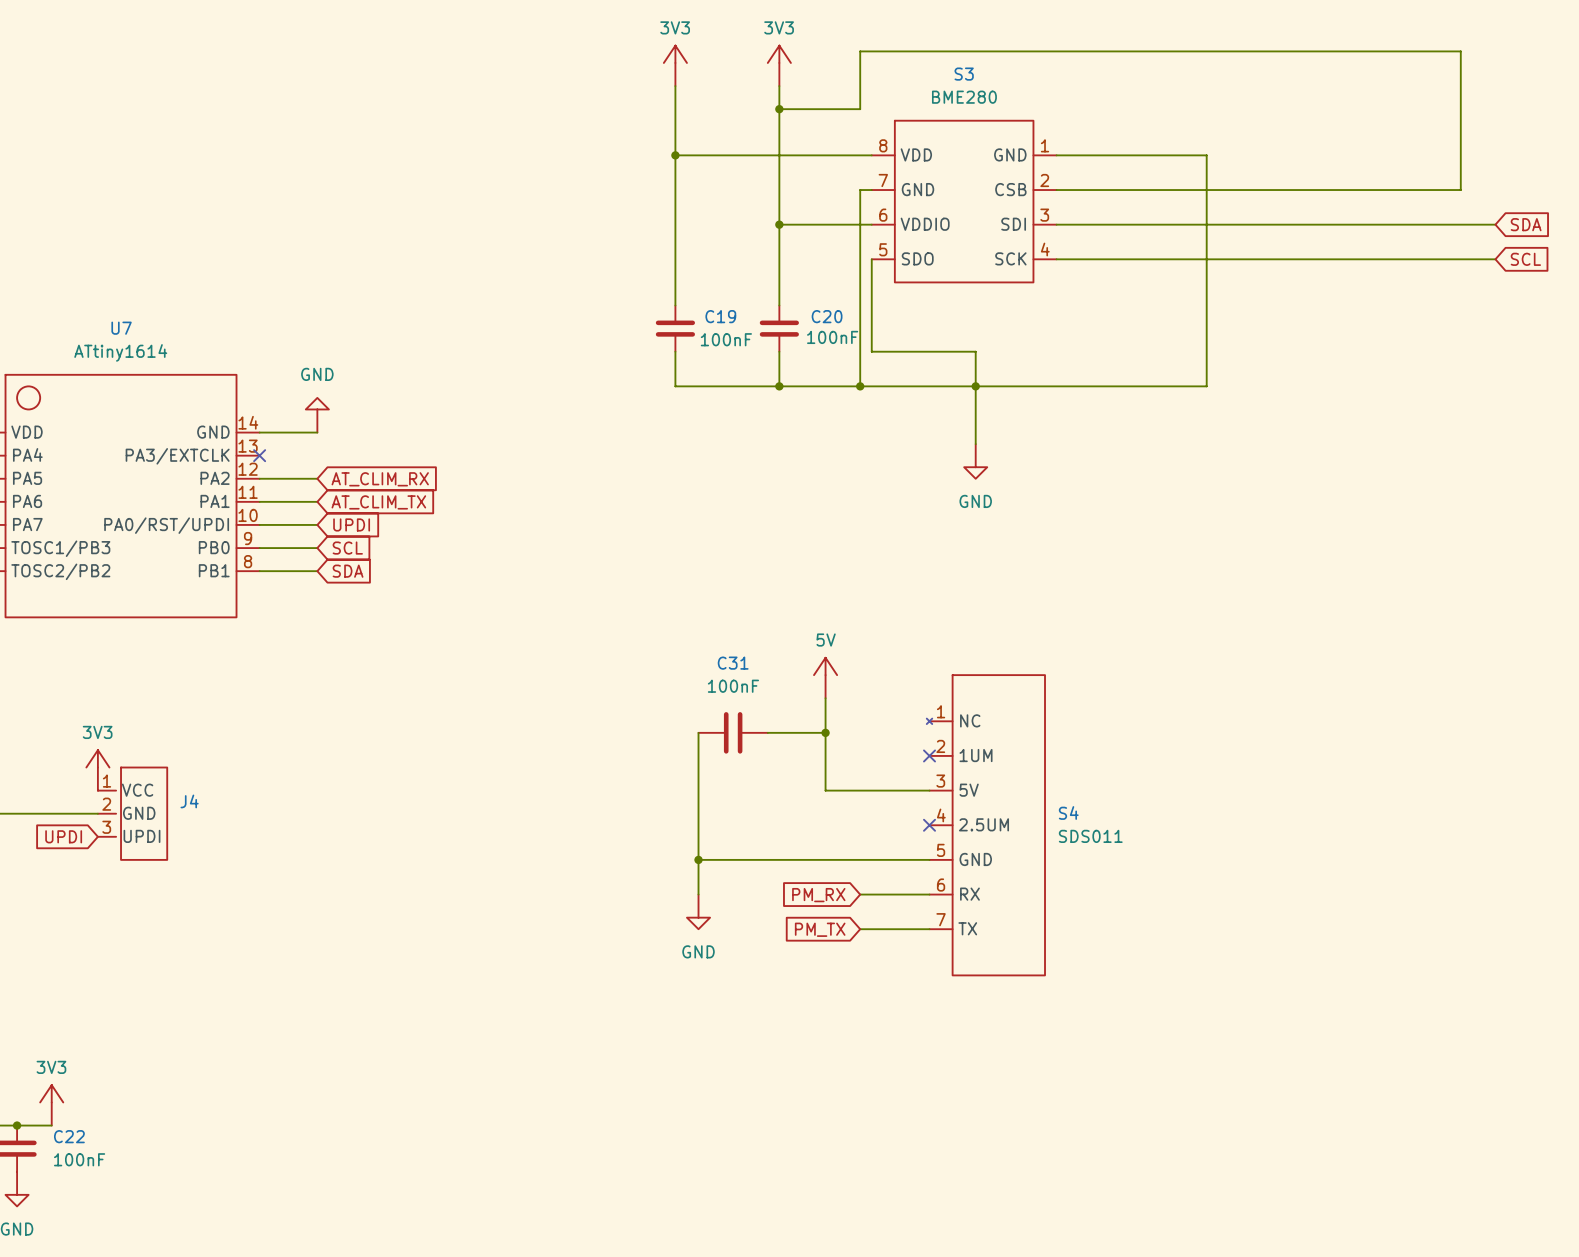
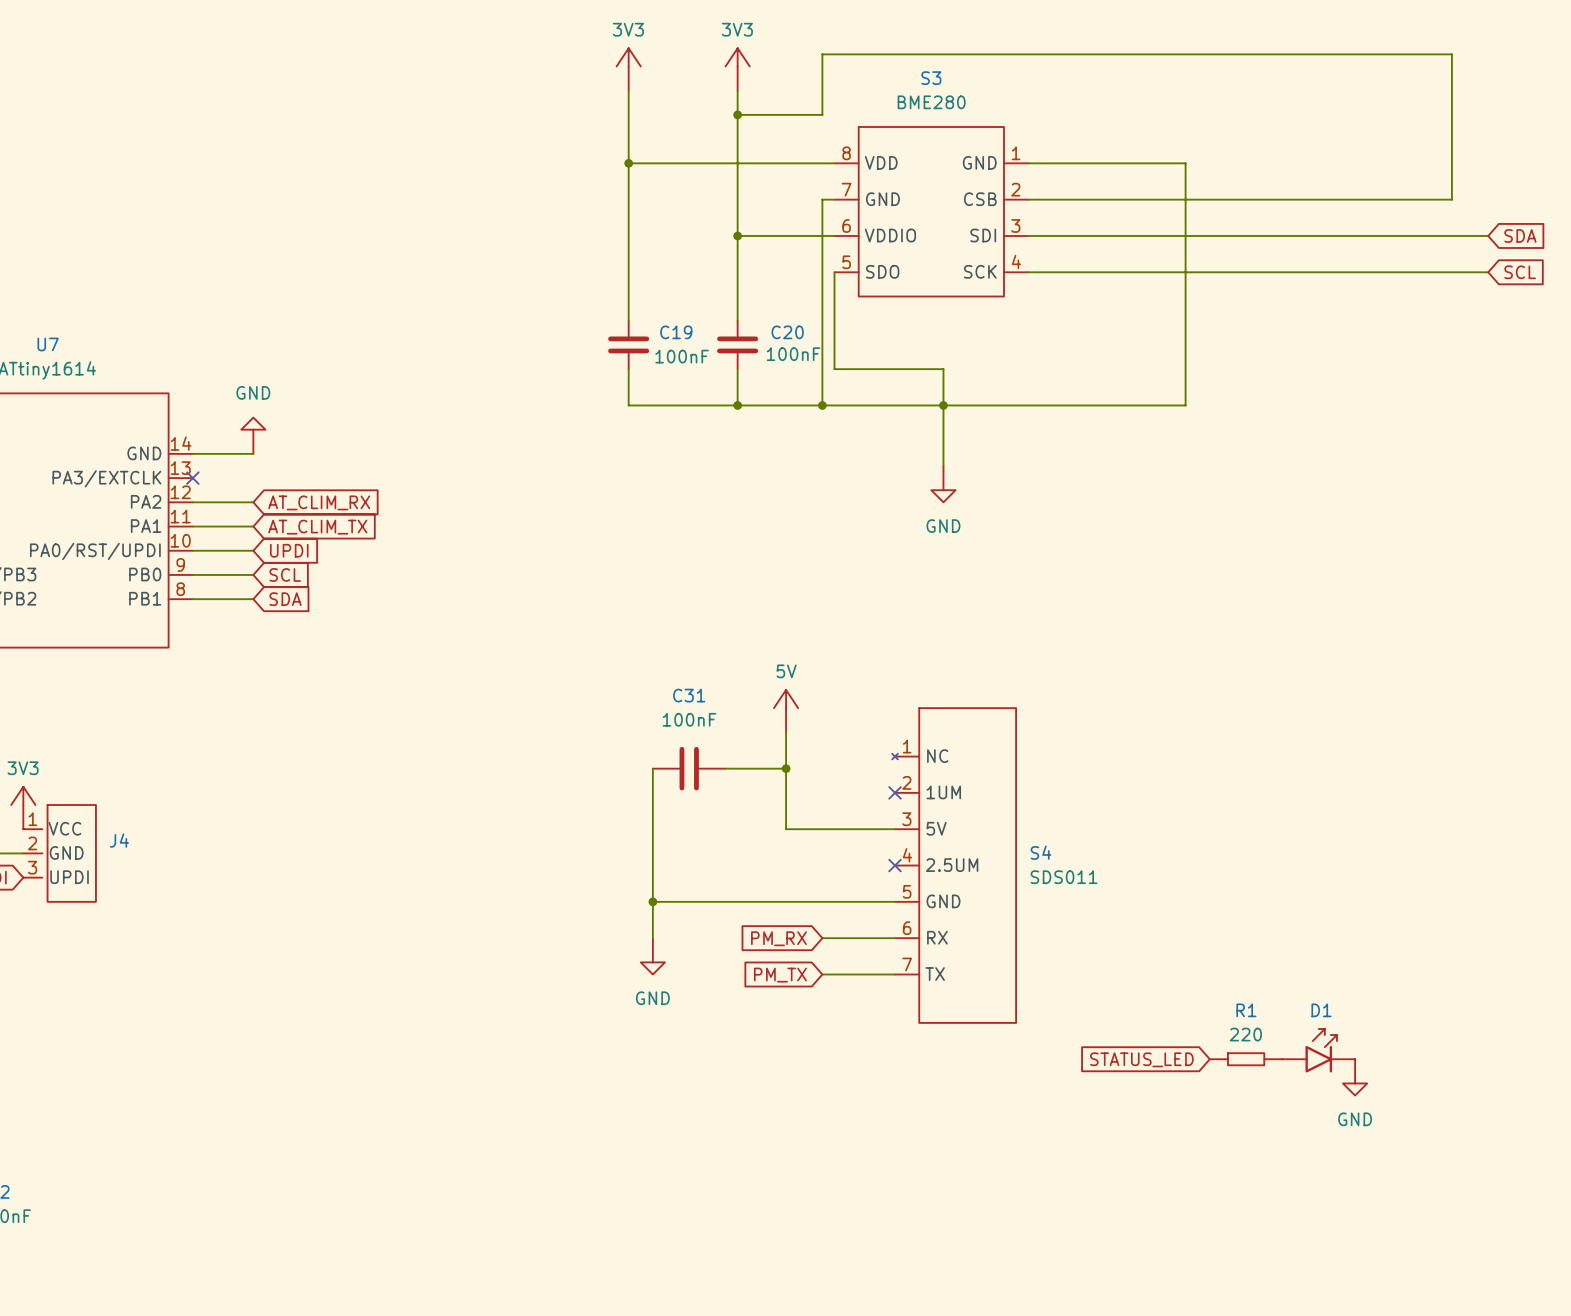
D1: none -> (1318, 1050)
global label: none -> STATUS_LED (1141, 1059)
R1: none -> 220 (1246, 1059)
power symbol: none -> GND (1355, 1077)

